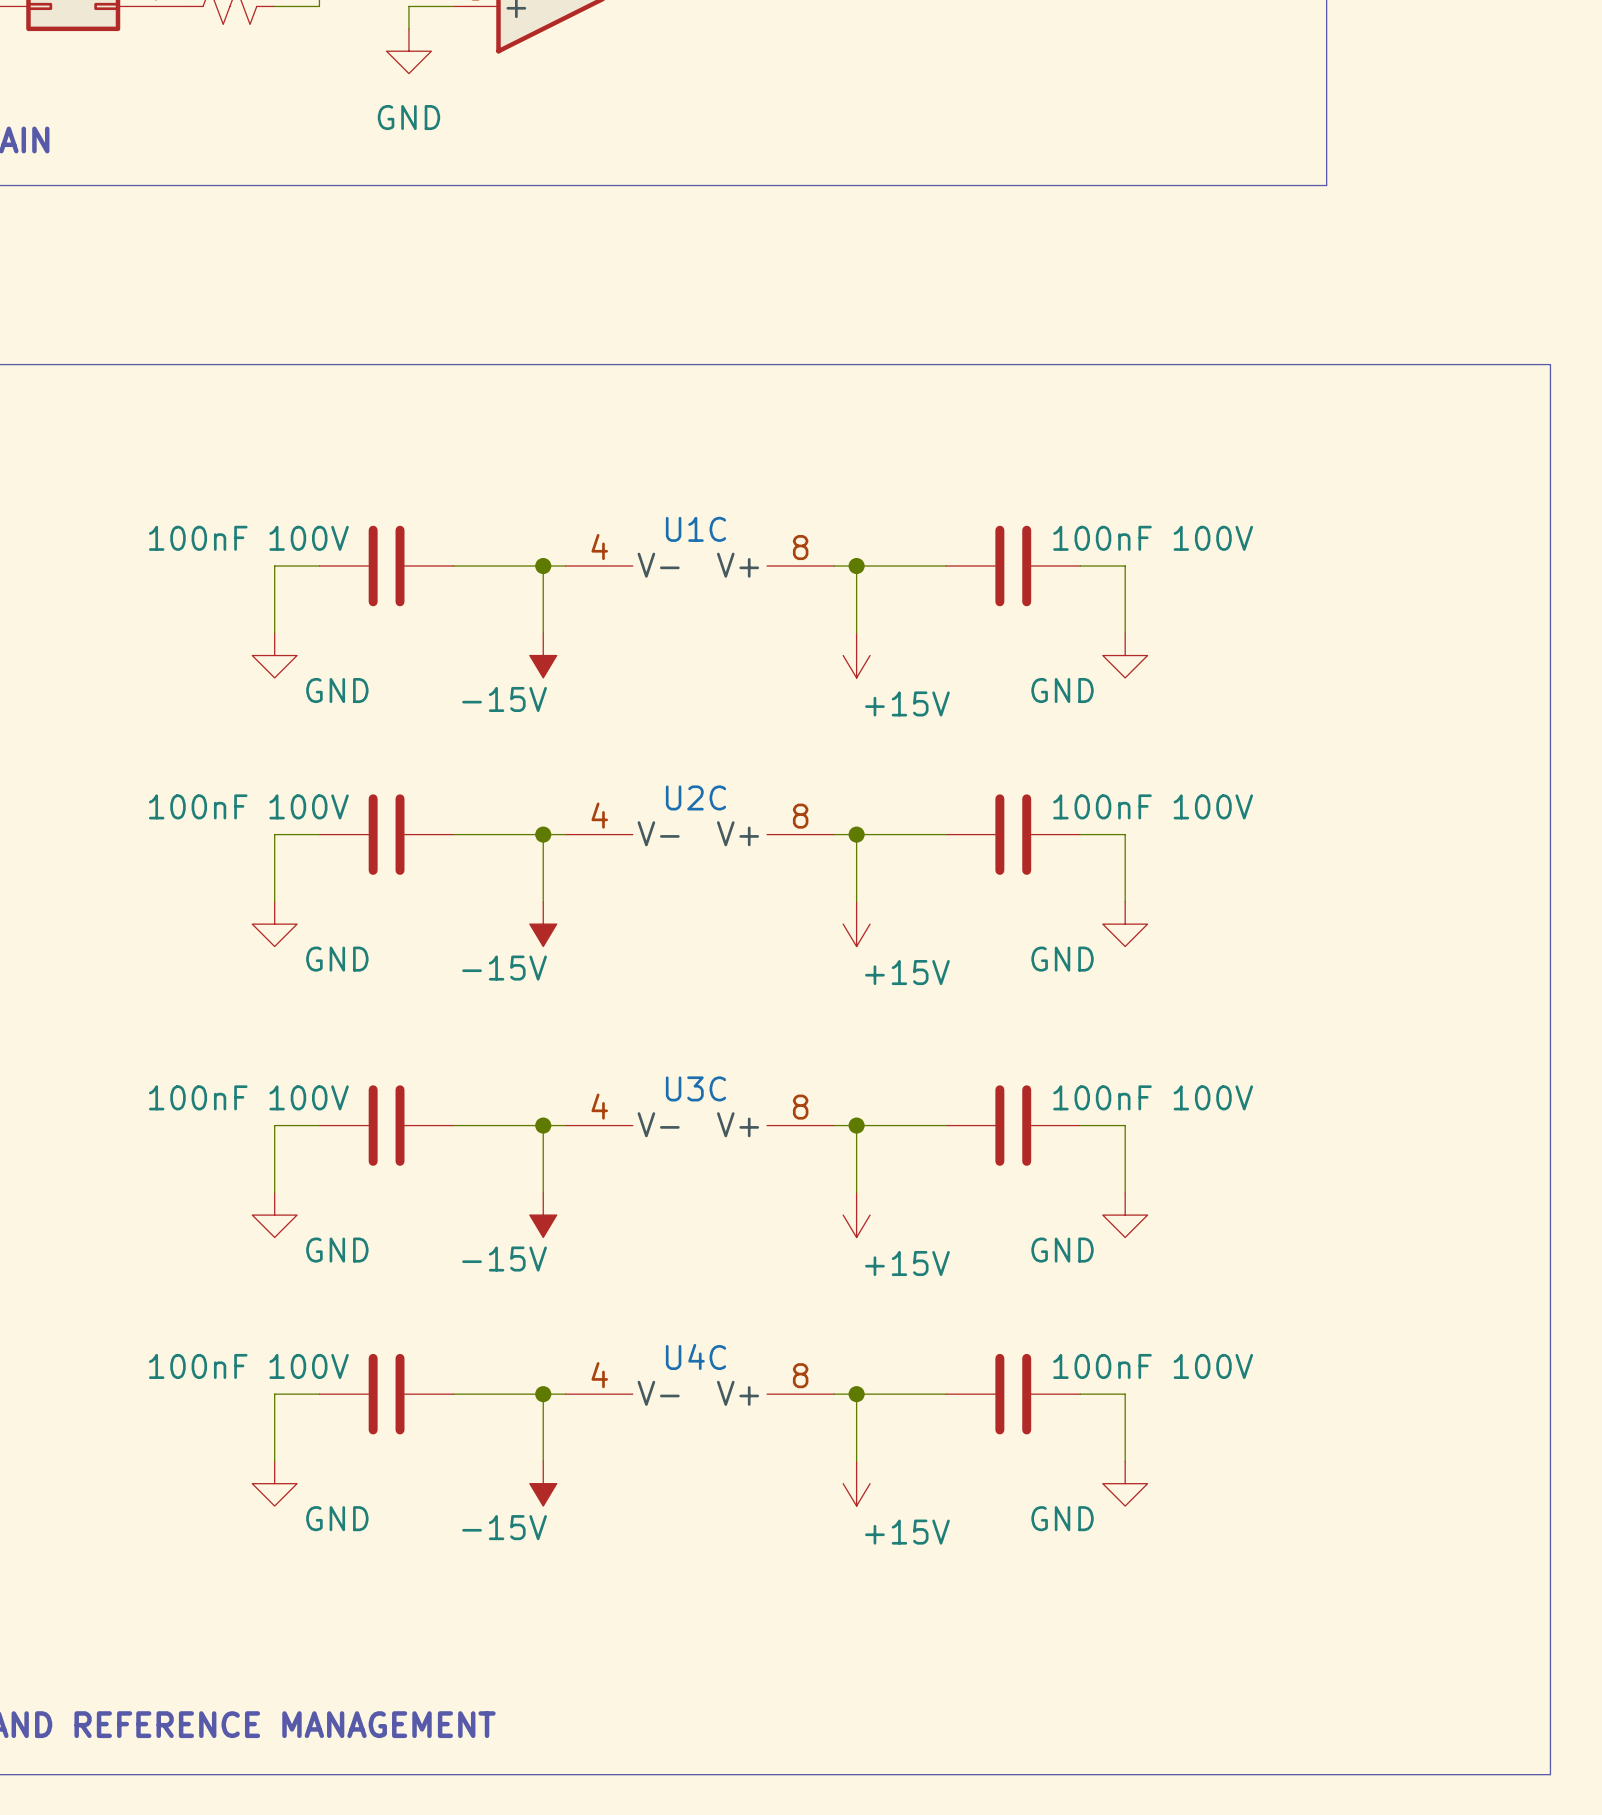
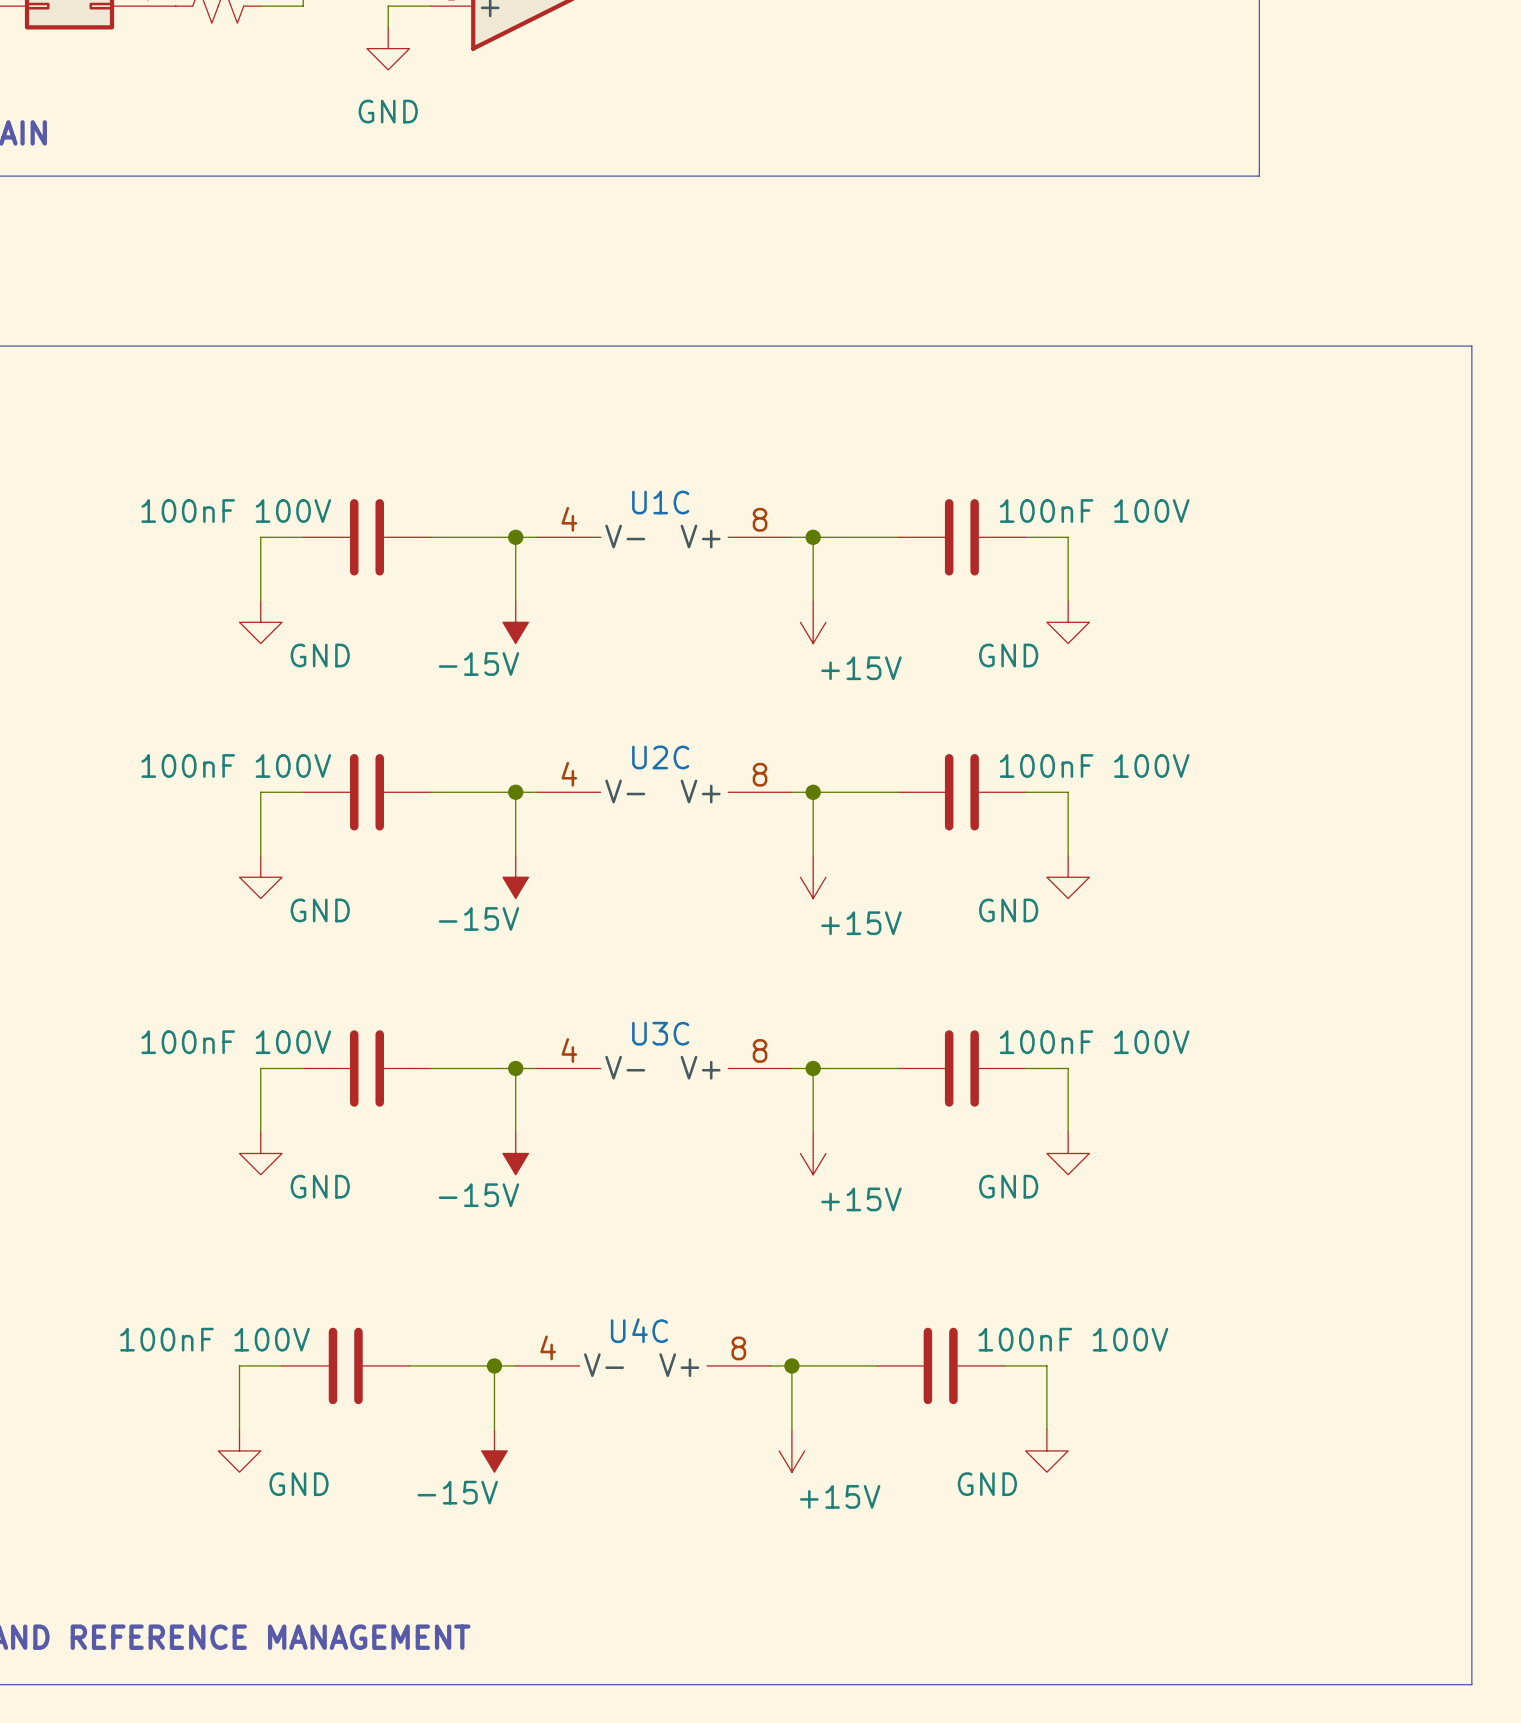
wire: (319, 1394) (274, 1394) (274, 1461) -> (281, 1365) (239, 1365) (239, 1429)
part position: (386, 1394) -> (345, 1365)
wire: (453, 1394) (565, 1394) -> (409, 1365) (515, 1365)
wire: (543, 1394) (543, 1461) -> (494, 1365) (494, 1429)
junction position: (543, 1394) -> (494, 1365)
U4C position: (699, 1394) -> (643, 1365)
wire: (834, 1394) (946, 1394) -> (770, 1365) (876, 1365)
wire: (856, 1394) (856, 1461) -> (791, 1365) (791, 1429)
junction position: (856, 1394) -> (791, 1365)
part position: (1013, 1394) -> (940, 1365)
wire: (1080, 1394) (1125, 1394) (1125, 1461) -> (1004, 1365) (1046, 1365) (1046, 1429)
power symbol position: GND (274, 1483) -> GND (239, 1450)
power symbol position: -15V (543, 1483) -> -15V (494, 1450)
power symbol position: +15V (856, 1483) -> +15V (791, 1450)
power symbol position: GND (1125, 1483) -> GND (1046, 1450)

